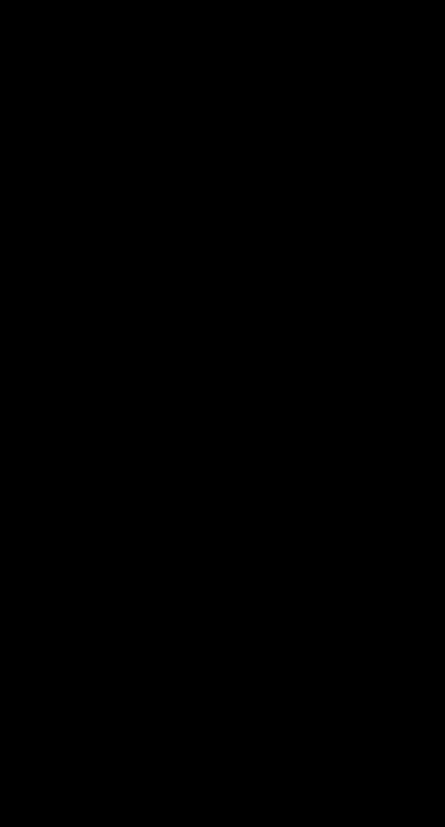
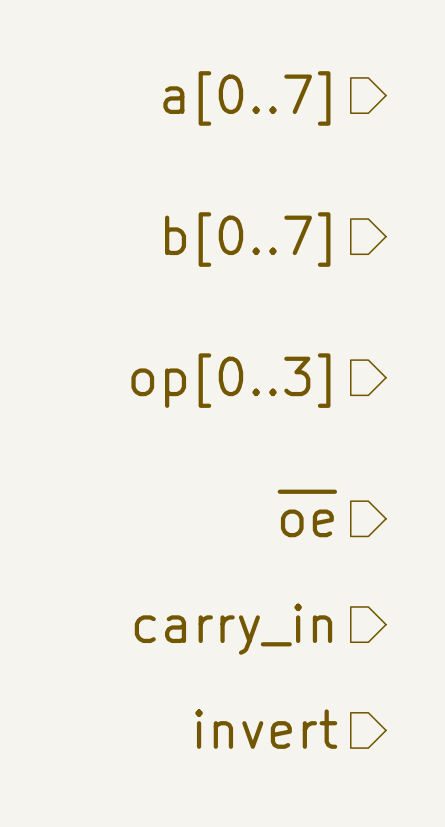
hierarchical label: none -> a[0..7] (246, 98)
hierarchical label: none -> b[0..7] (247, 239)
hierarchical label: none -> op[0..3] (230, 380)
hierarchical label: none -> ~{oe} (307, 513)
hierarchical label: none -> carry_in (233, 629)
hierarchical label: none -> invert (266, 729)

